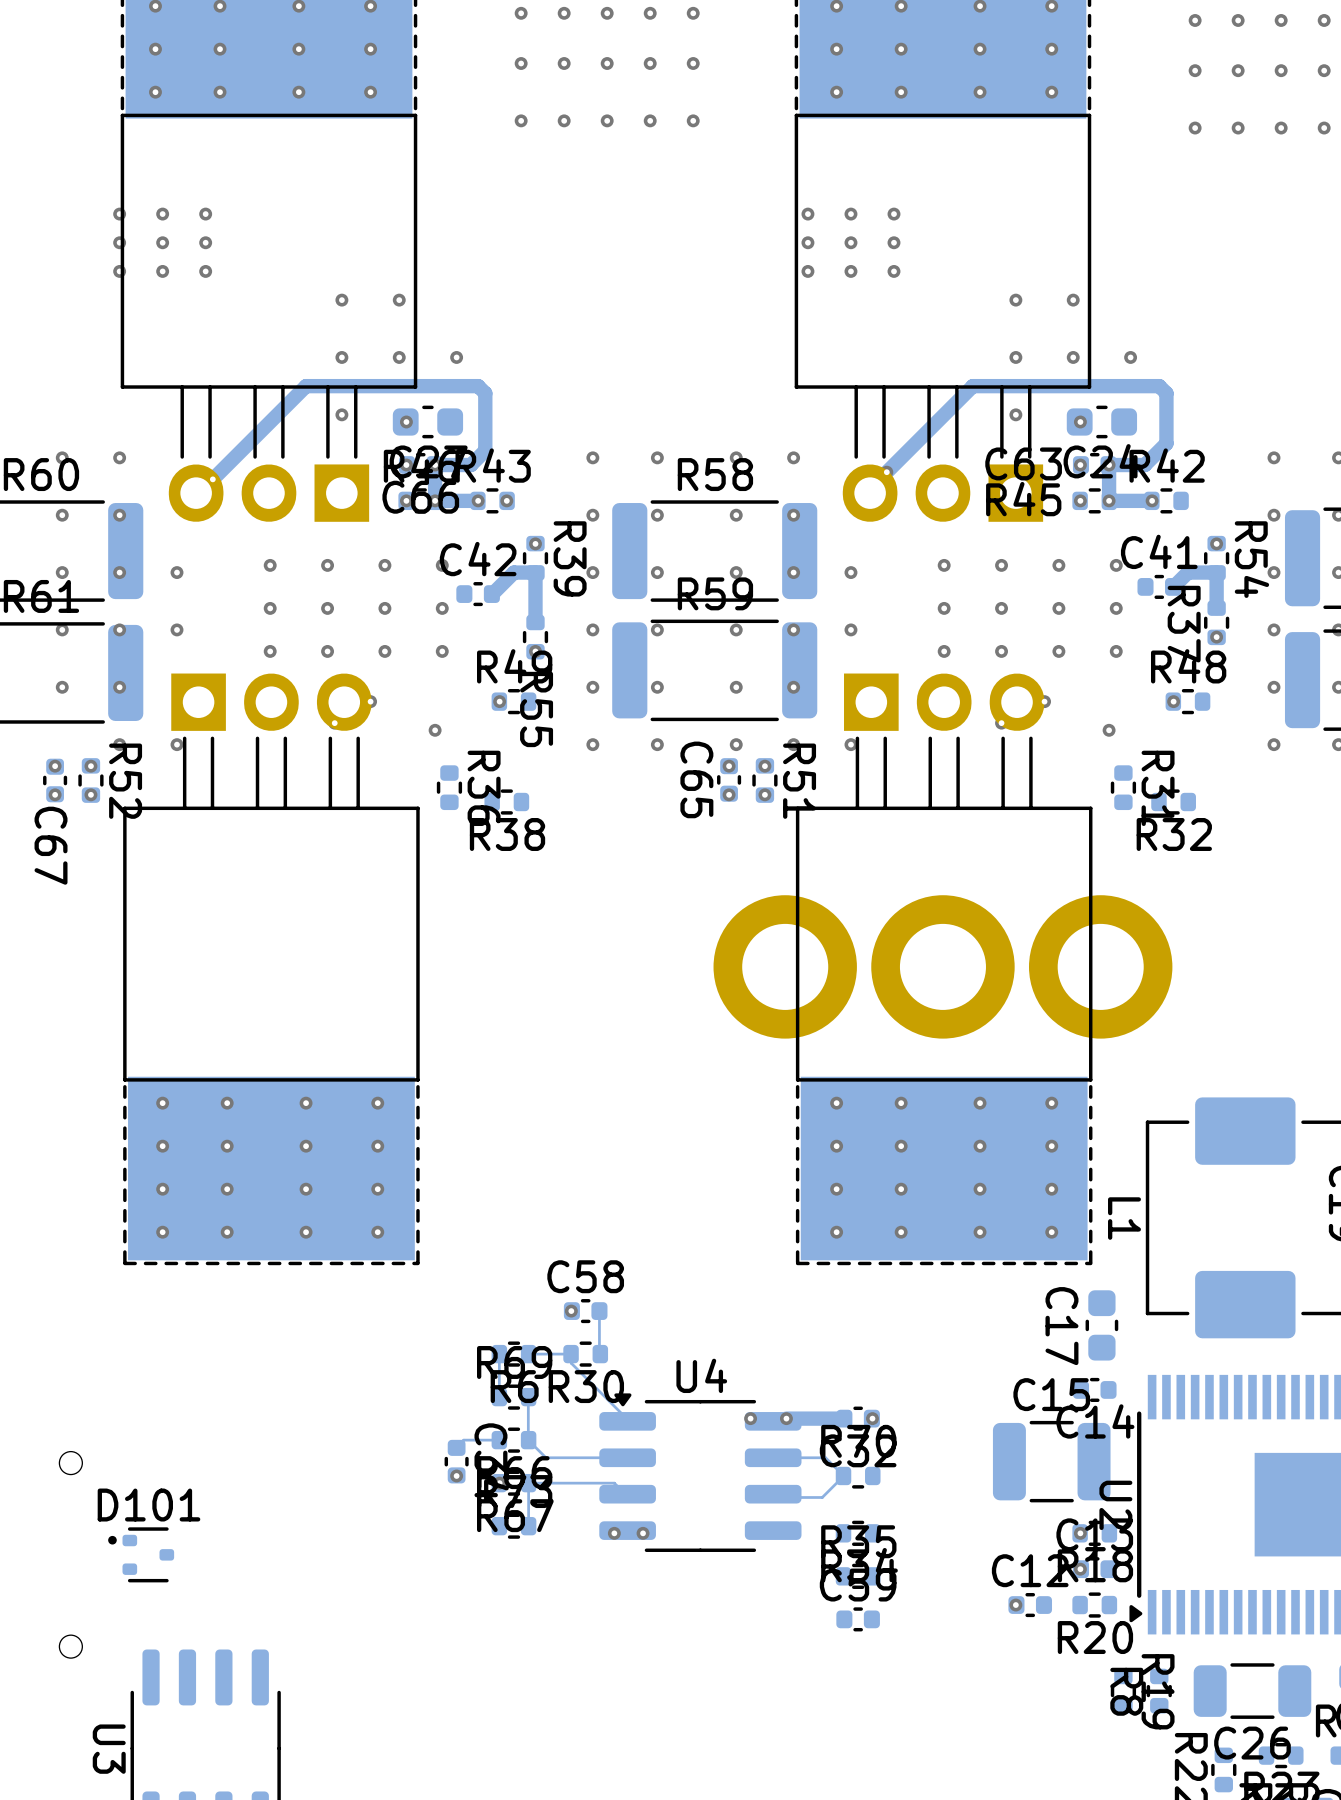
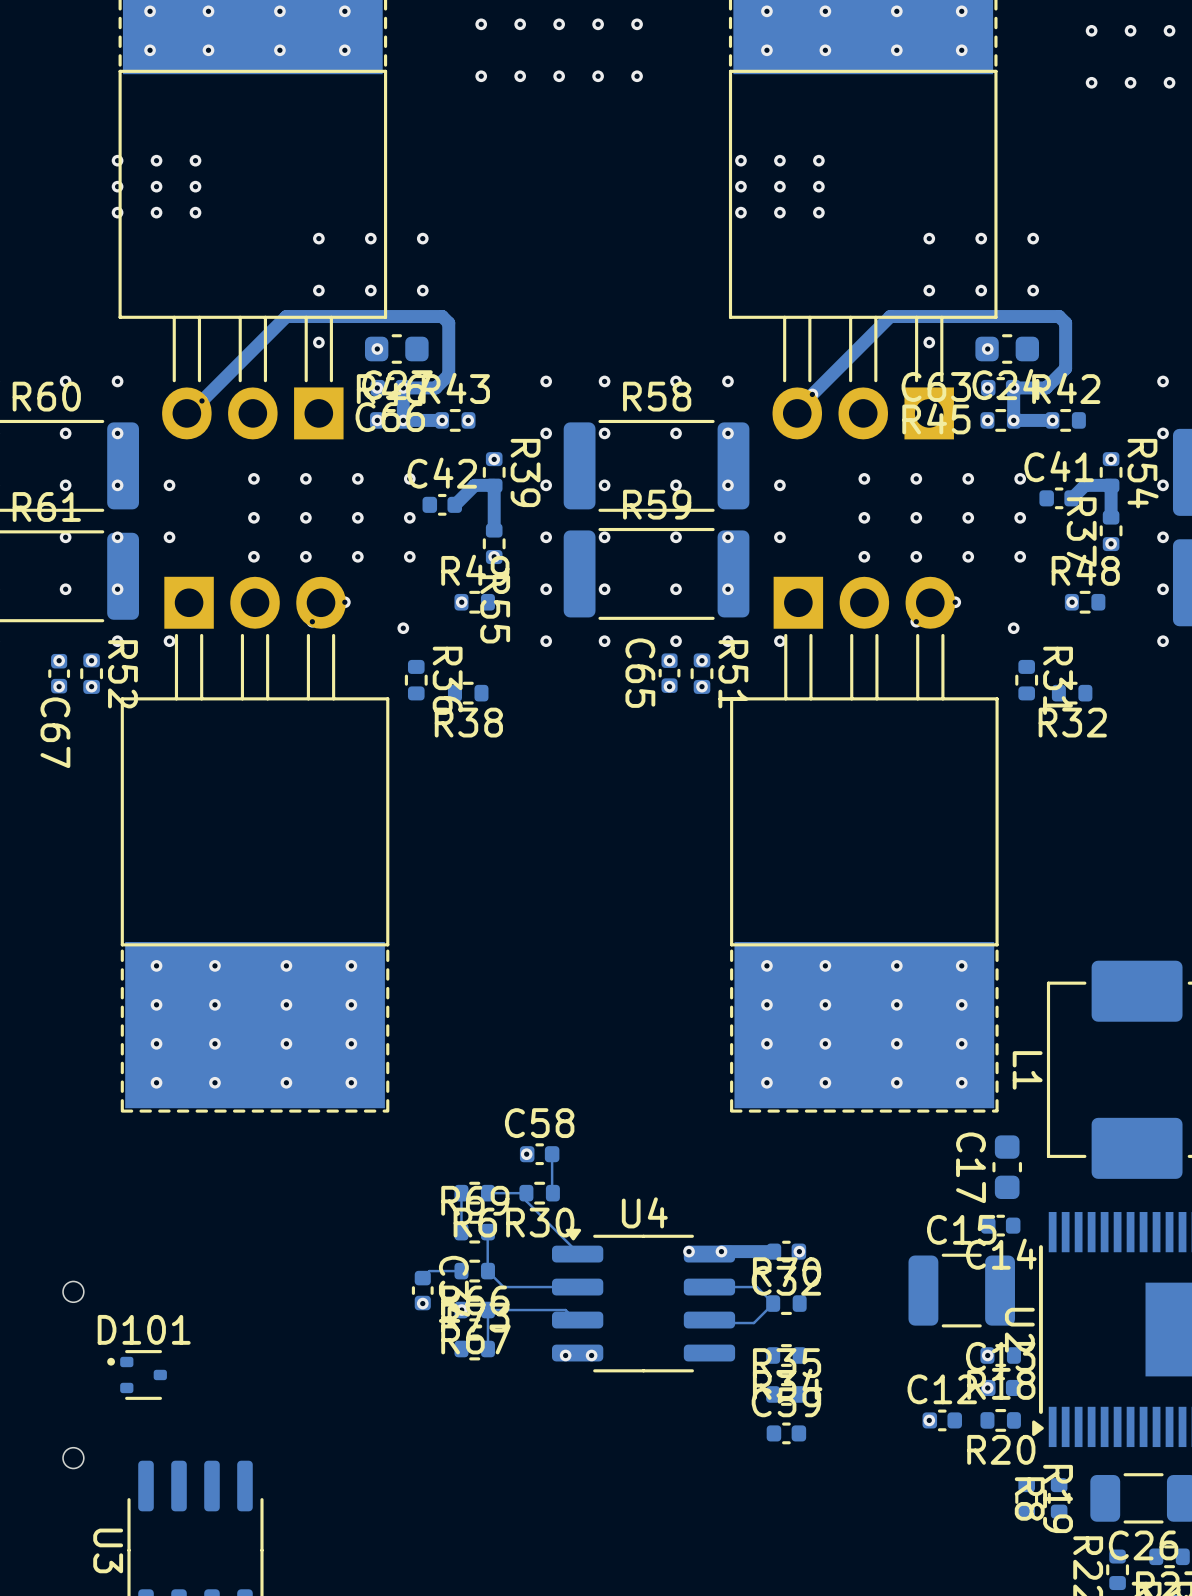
via: none -> (422, 238)
via: none -> (1033, 238)
part: (942, 966) -> none

